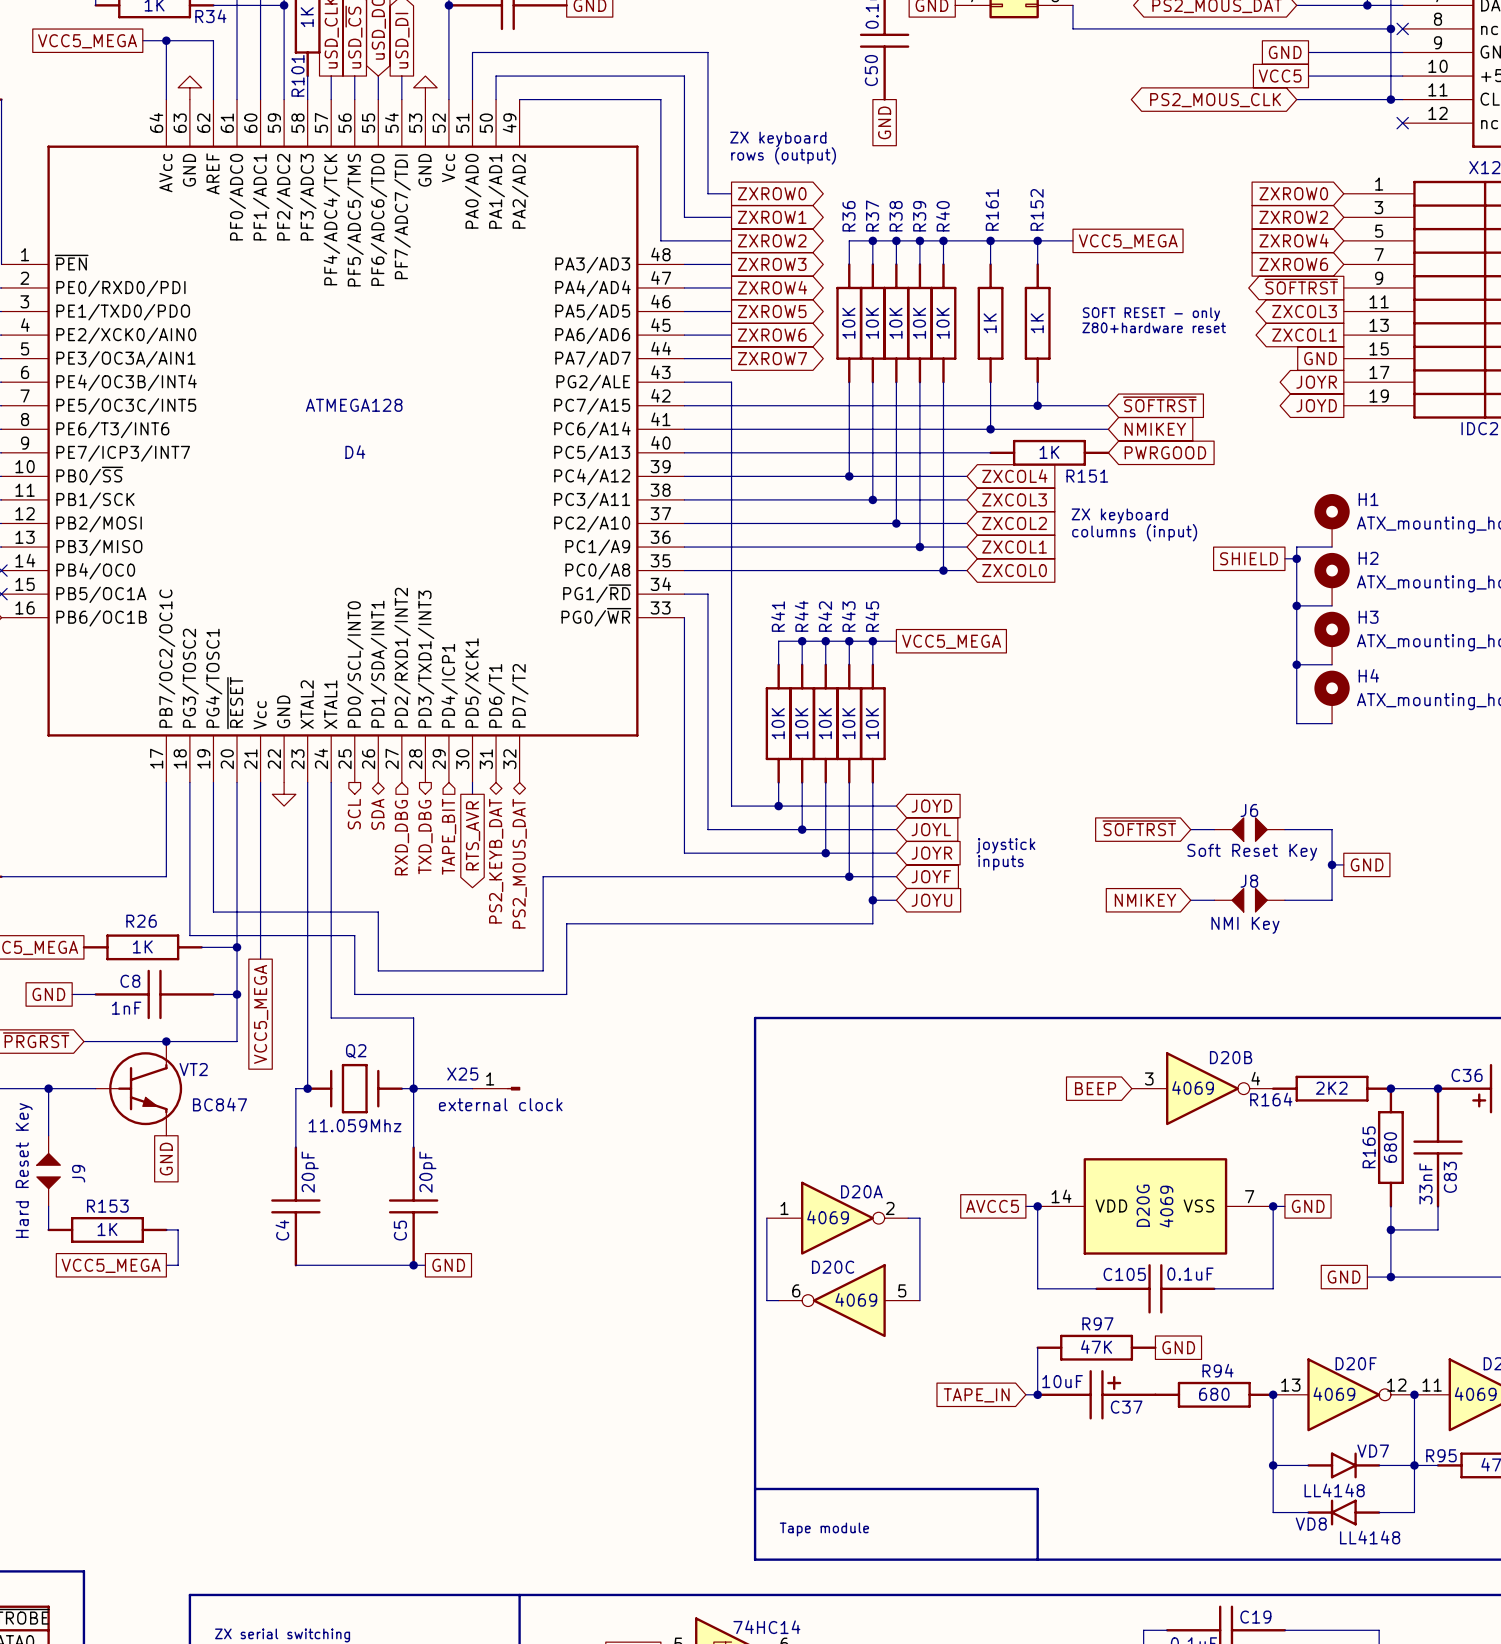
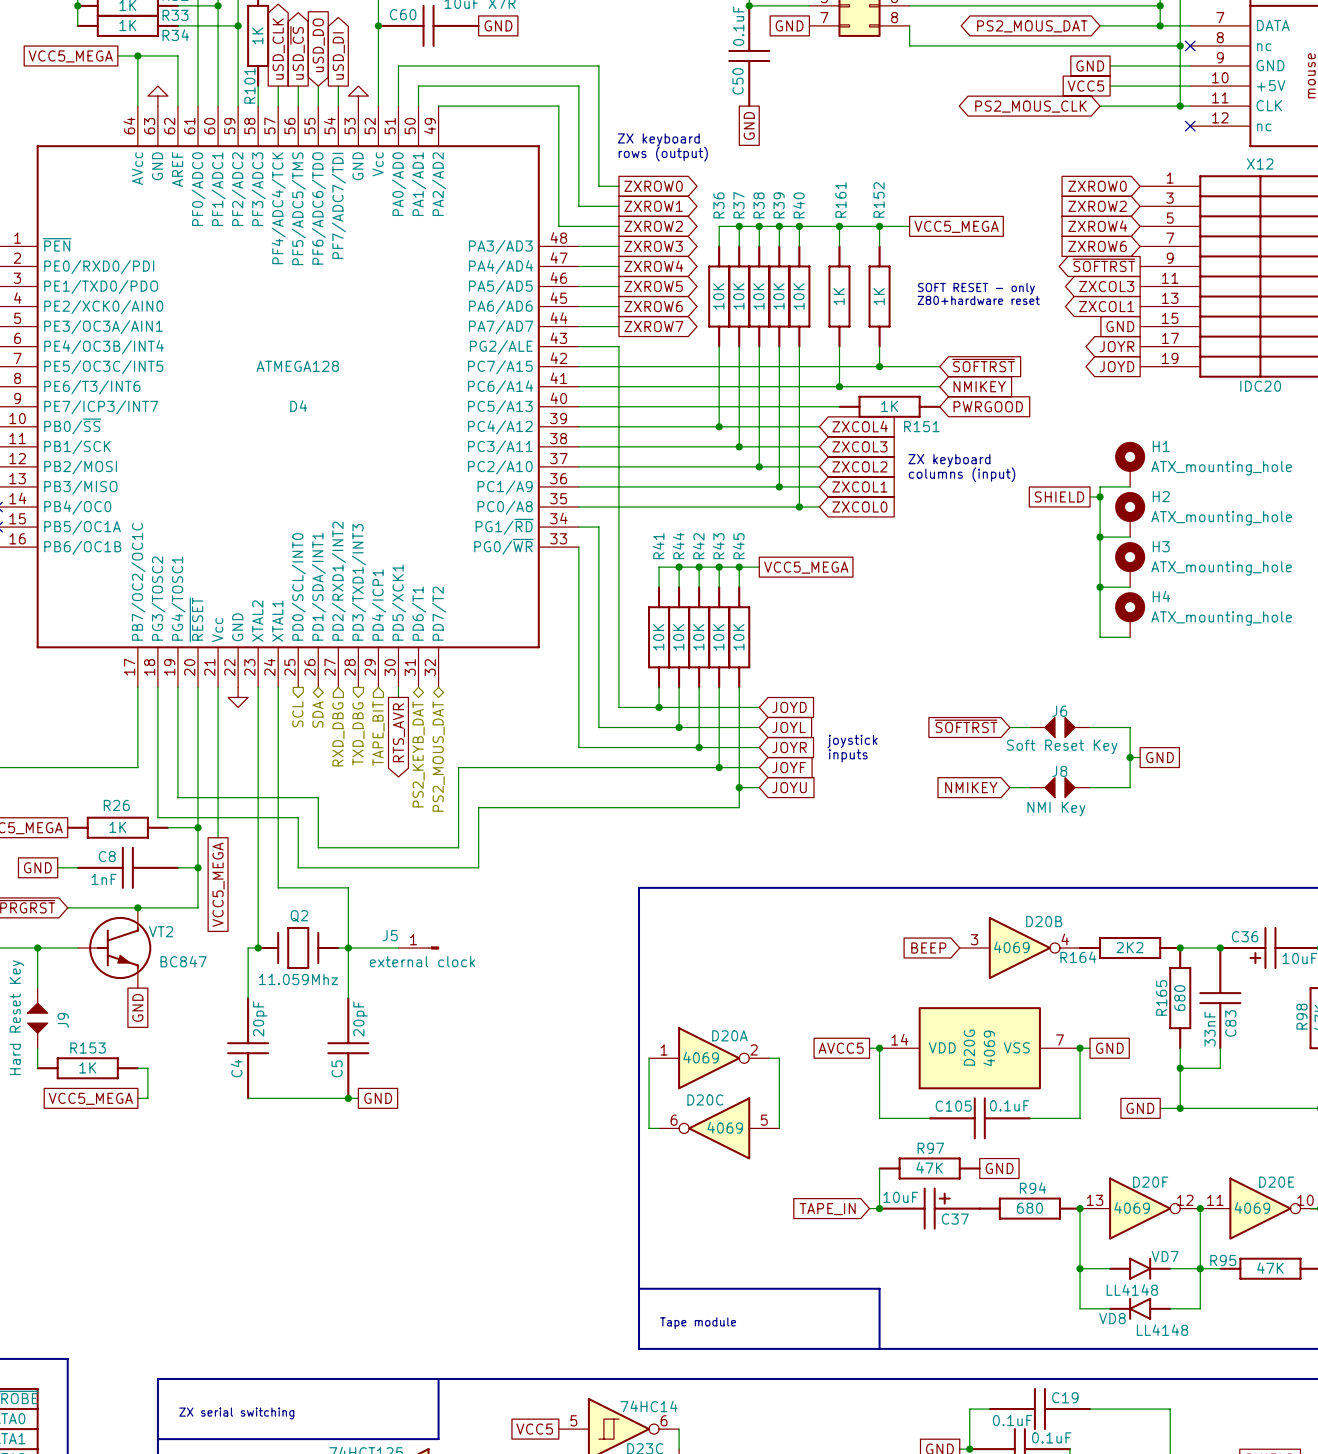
X25 name: X25 (462, 1074) -> J5 (390, 935)

